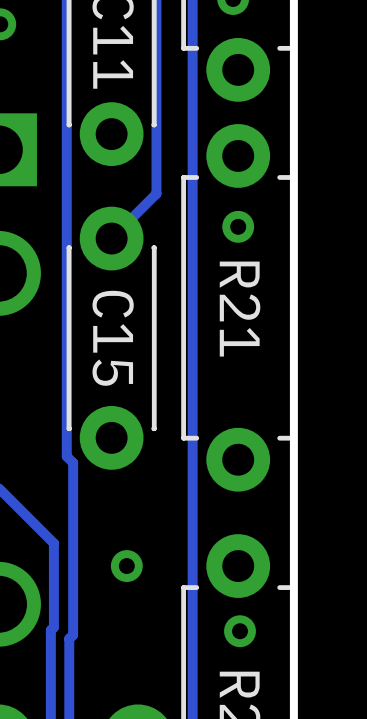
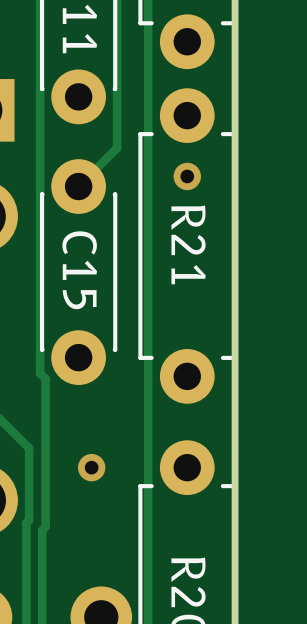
via: (240, 631) -> none

